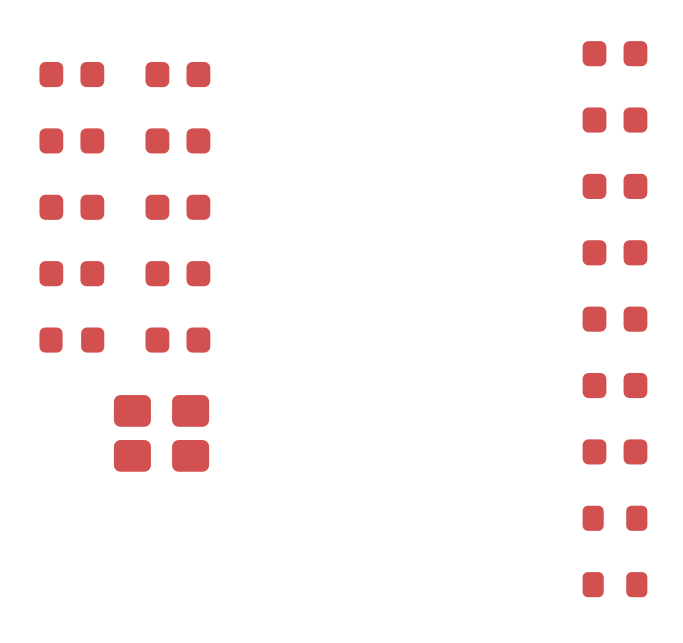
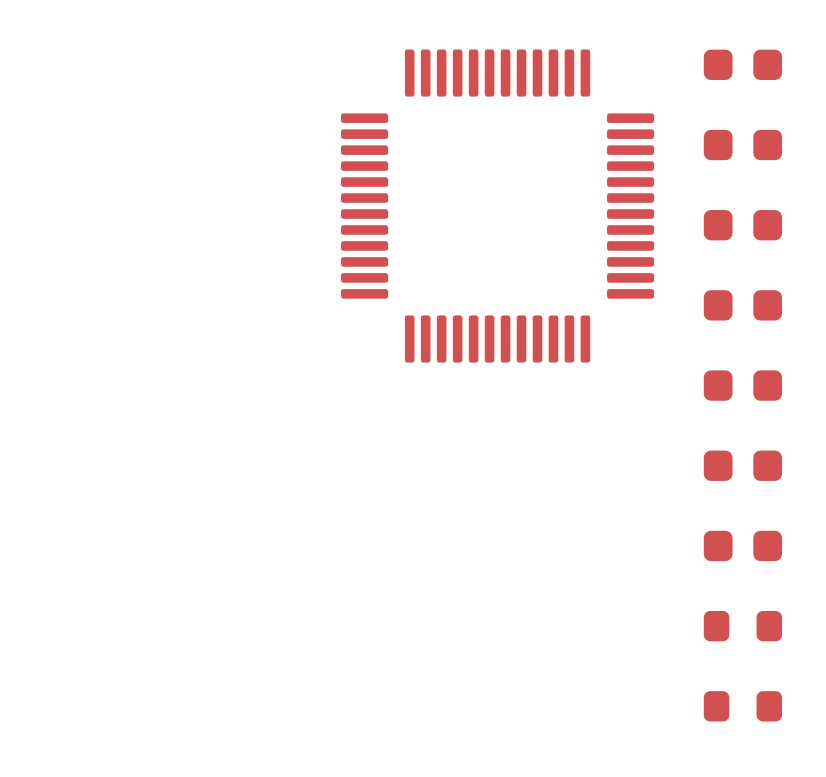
part: (71, 74) -> none
part: (177, 74) -> none
part: (71, 140) -> none
part: (177, 140) -> none
part: none -> (497, 206)
part: (71, 207) -> none
part: (177, 207) -> none
part: (71, 273) -> none
part: (177, 273) -> none
part: (71, 340) -> none
part: (177, 340) -> none
part: (161, 433) -> none

